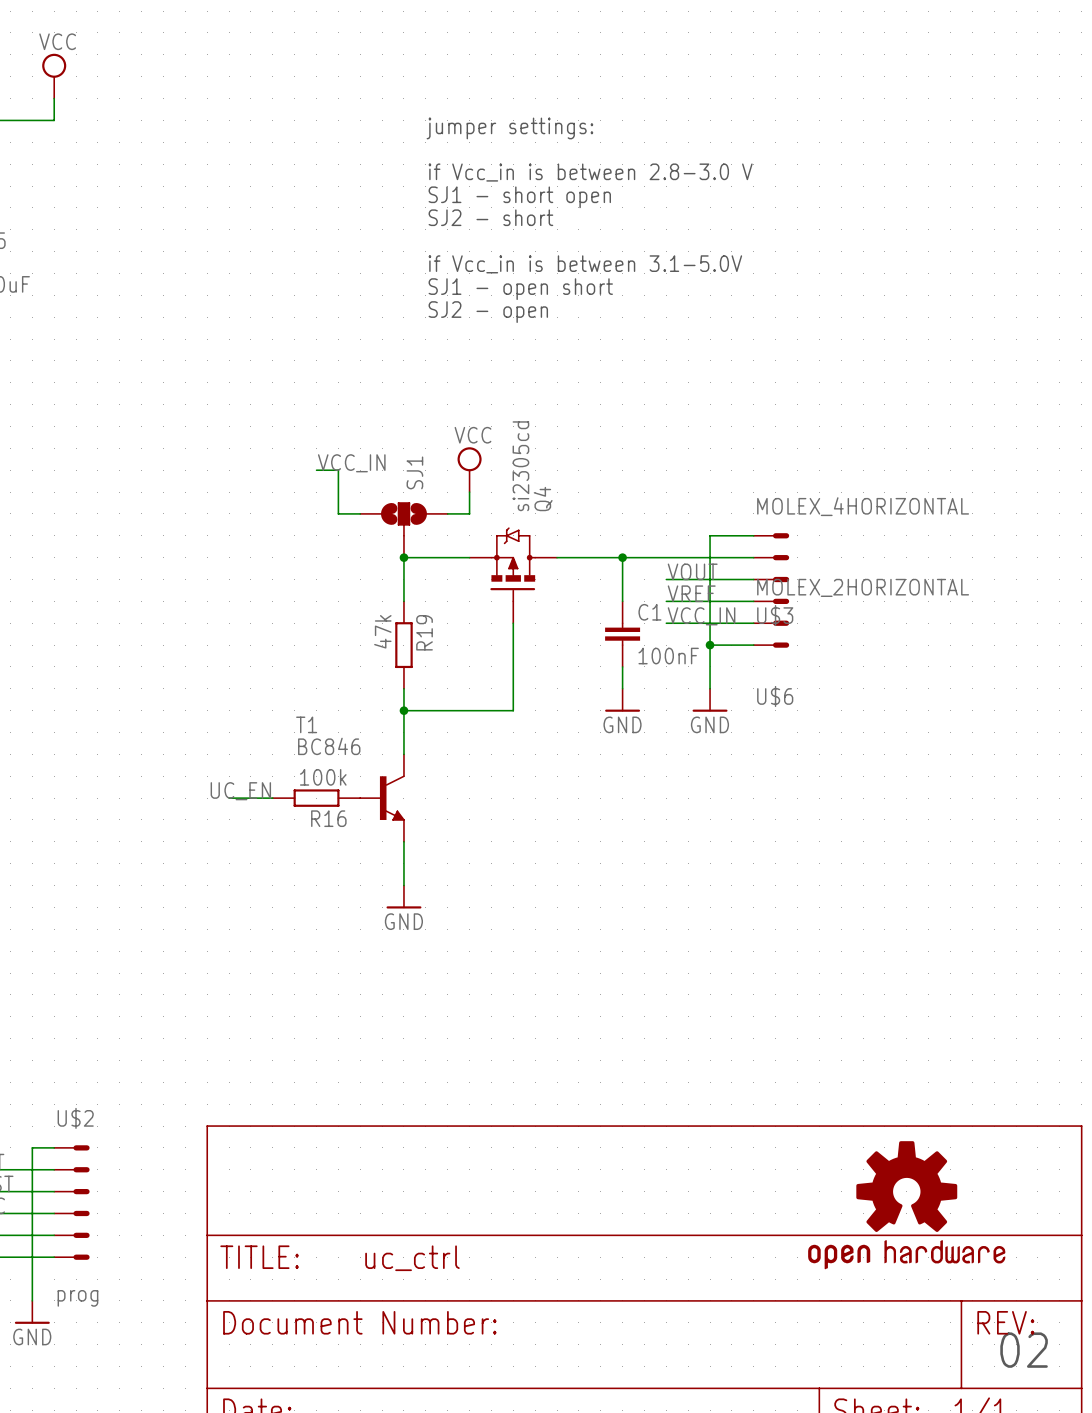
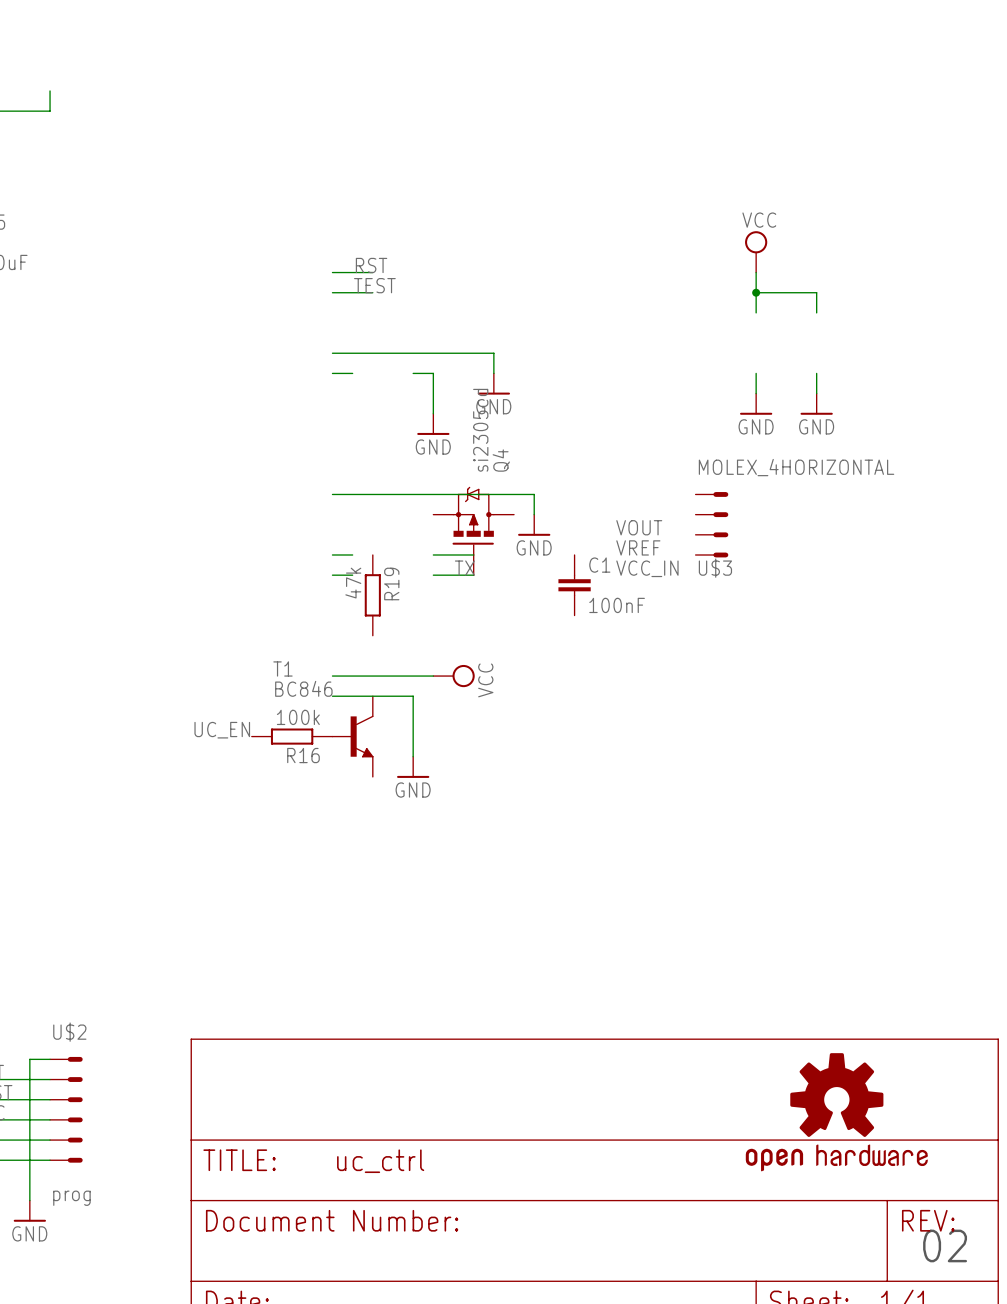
power symbol: VCC (54, 76) -> none
text: jumper settings: (509, 128) -> none
text: if Vcc_in is between 2.8-3.0 V (590, 172) -> none
text: SJ1 - short open (519, 197) -> none
text: SJ2 - short (490, 217) -> none
text: if Vcc_in is between 3.1-5.0V (585, 264) -> none
power symbol: none -> VCC (756, 251)
label: none -> RST (371, 265)
text: SJ1 - open short (520, 289) -> none
wire: none -> (332, 272) (372, 272)
wire: none -> (756, 272) (756, 312)
label: none -> TEST (374, 285)
text: SJ2 - open (488, 312) -> none
wire: none -> (332, 292) (372, 292)
wire: none -> (756, 292) (816, 292) (816, 312)
junction: none -> (756, 292)
wire: none -> (332, 353) (493, 353) (493, 373)
wire: none -> (332, 373) (352, 373)
wire: none -> (413, 373) (433, 373) (433, 413)
wire: none -> (756, 373) (756, 393)
wire: none -> (816, 373) (816, 393)
power symbol: none -> GND (493, 384)
power symbol: none -> GND (756, 404)
power symbol: none -> GND (816, 404)
power symbol: none -> GND (433, 424)
label: VCC_IN (351, 463) -> none
power symbol: VCC (469, 469) -> none
wire: (316, 470) (338, 470) (338, 513) (360, 513) -> none
wire: (469, 492) (469, 513) (447, 513) -> none
SJ1: (403, 530) -> none
wire: none -> (332, 494) (534, 494) (534, 514)
wire: (753, 535) (710, 535) (710, 688) -> none
junction: (403, 557) -> none
wire: (469, 557) (403, 557) (403, 601) -> none
wire: (557, 557) (753, 557) -> none
wire: (622, 557) (622, 601) -> none
junction: (622, 557) -> none
power symbol: none -> GND (534, 525)
wire: (666, 579) (753, 579) -> none
wire: none -> (332, 554) (352, 554)
wire: none -> (433, 554) (473, 554)
wire: (666, 601) (753, 601) -> none
label: none -> TX (464, 568)
wire: none -> (332, 575) (352, 575)
wire: (513, 623) (513, 710) (403, 710) -> (473, 575) (433, 575)
wire: (666, 623) (753, 623) -> none
U$6: MOLEX_2HORIZONTAL (771, 634) -> none
wire: (710, 645) (753, 645) -> none
junction: (710, 645) -> none
wire: (622, 666) (622, 688) -> none
wire: (403, 688) (403, 754) -> none
power symbol: GND (622, 700) -> none
power symbol: GND (710, 700) -> none
junction: (403, 710) -> none
wire: none -> (332, 676) (433, 676)
power symbol: none -> VCC (454, 676)
wire: none -> (332, 696) (413, 696) (413, 756)
wire: (229, 798) (272, 798) -> none
wire: (403, 841) (403, 885) -> none
power symbol position: GND (403, 897) -> GND (413, 767)

